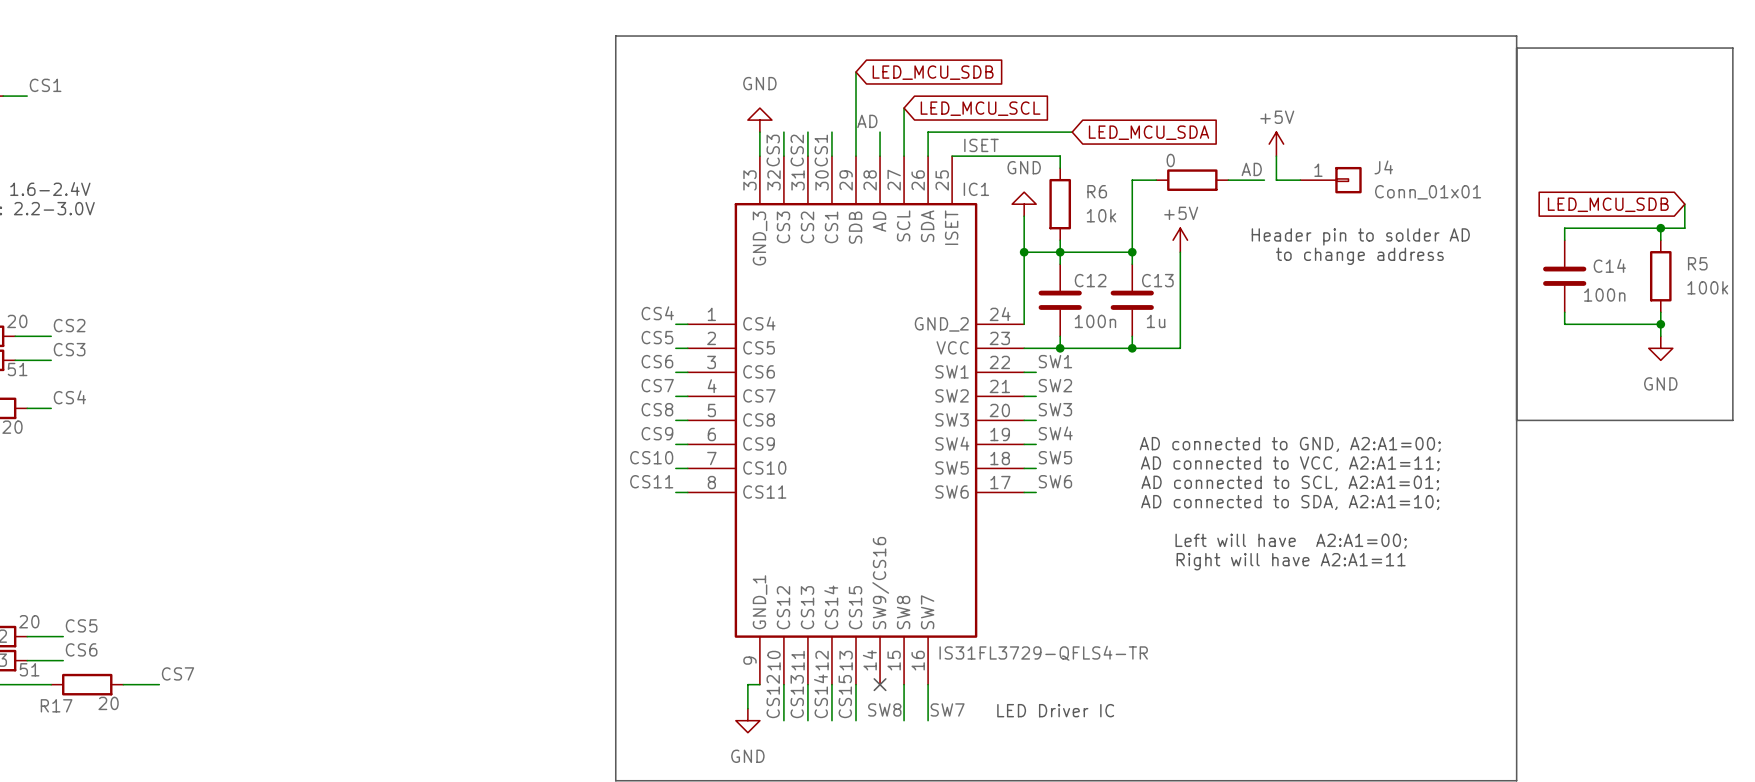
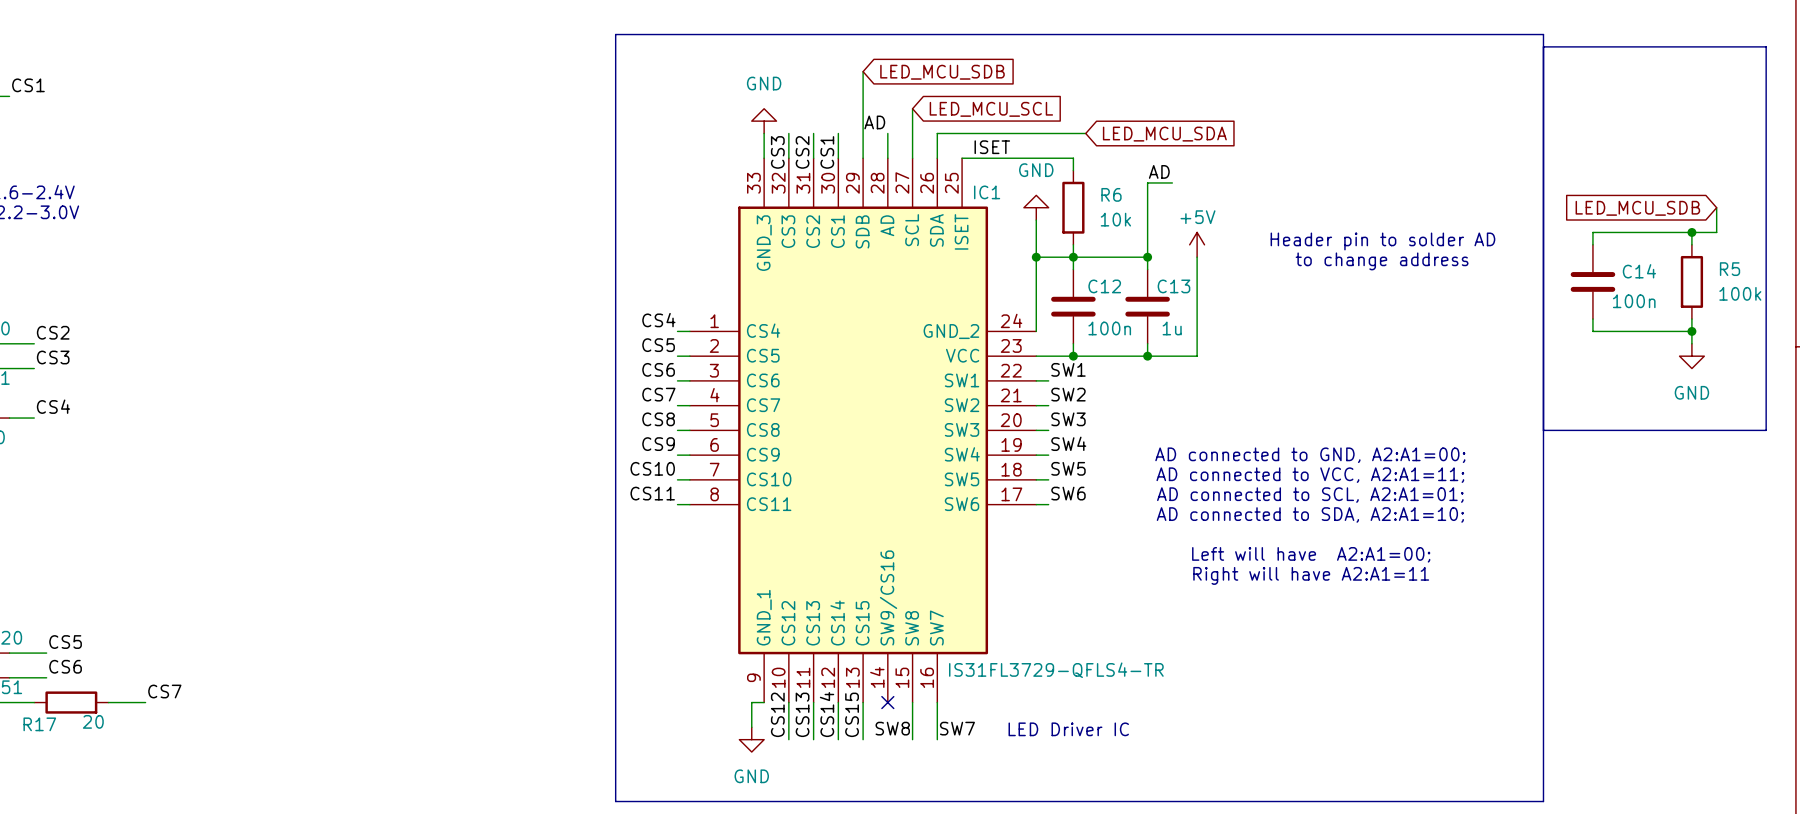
power symbol: +5V (1276, 144) -> none
wire: (1276, 156) (1276, 180) (1300, 180) -> none
label position: AD (1251, 169) -> AD (1159, 171)
part: 0 (1192, 180) -> none
wire: (1228, 180) (1264, 180) -> none
J4: Conn_01x01 (1331, 180) -> none

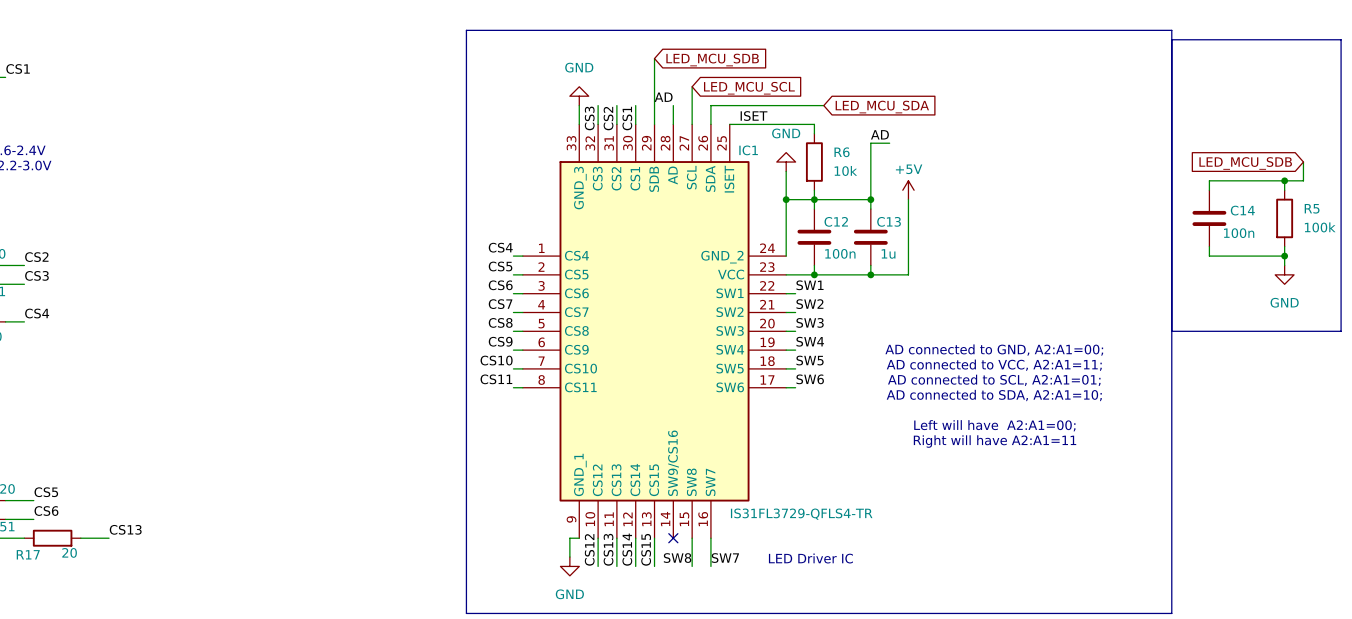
text: Header pin to solder AD (1382, 241) -> none
text: to change address (1382, 261) -> none
label: CS7 (164, 691) -> CS13 (125, 529)

